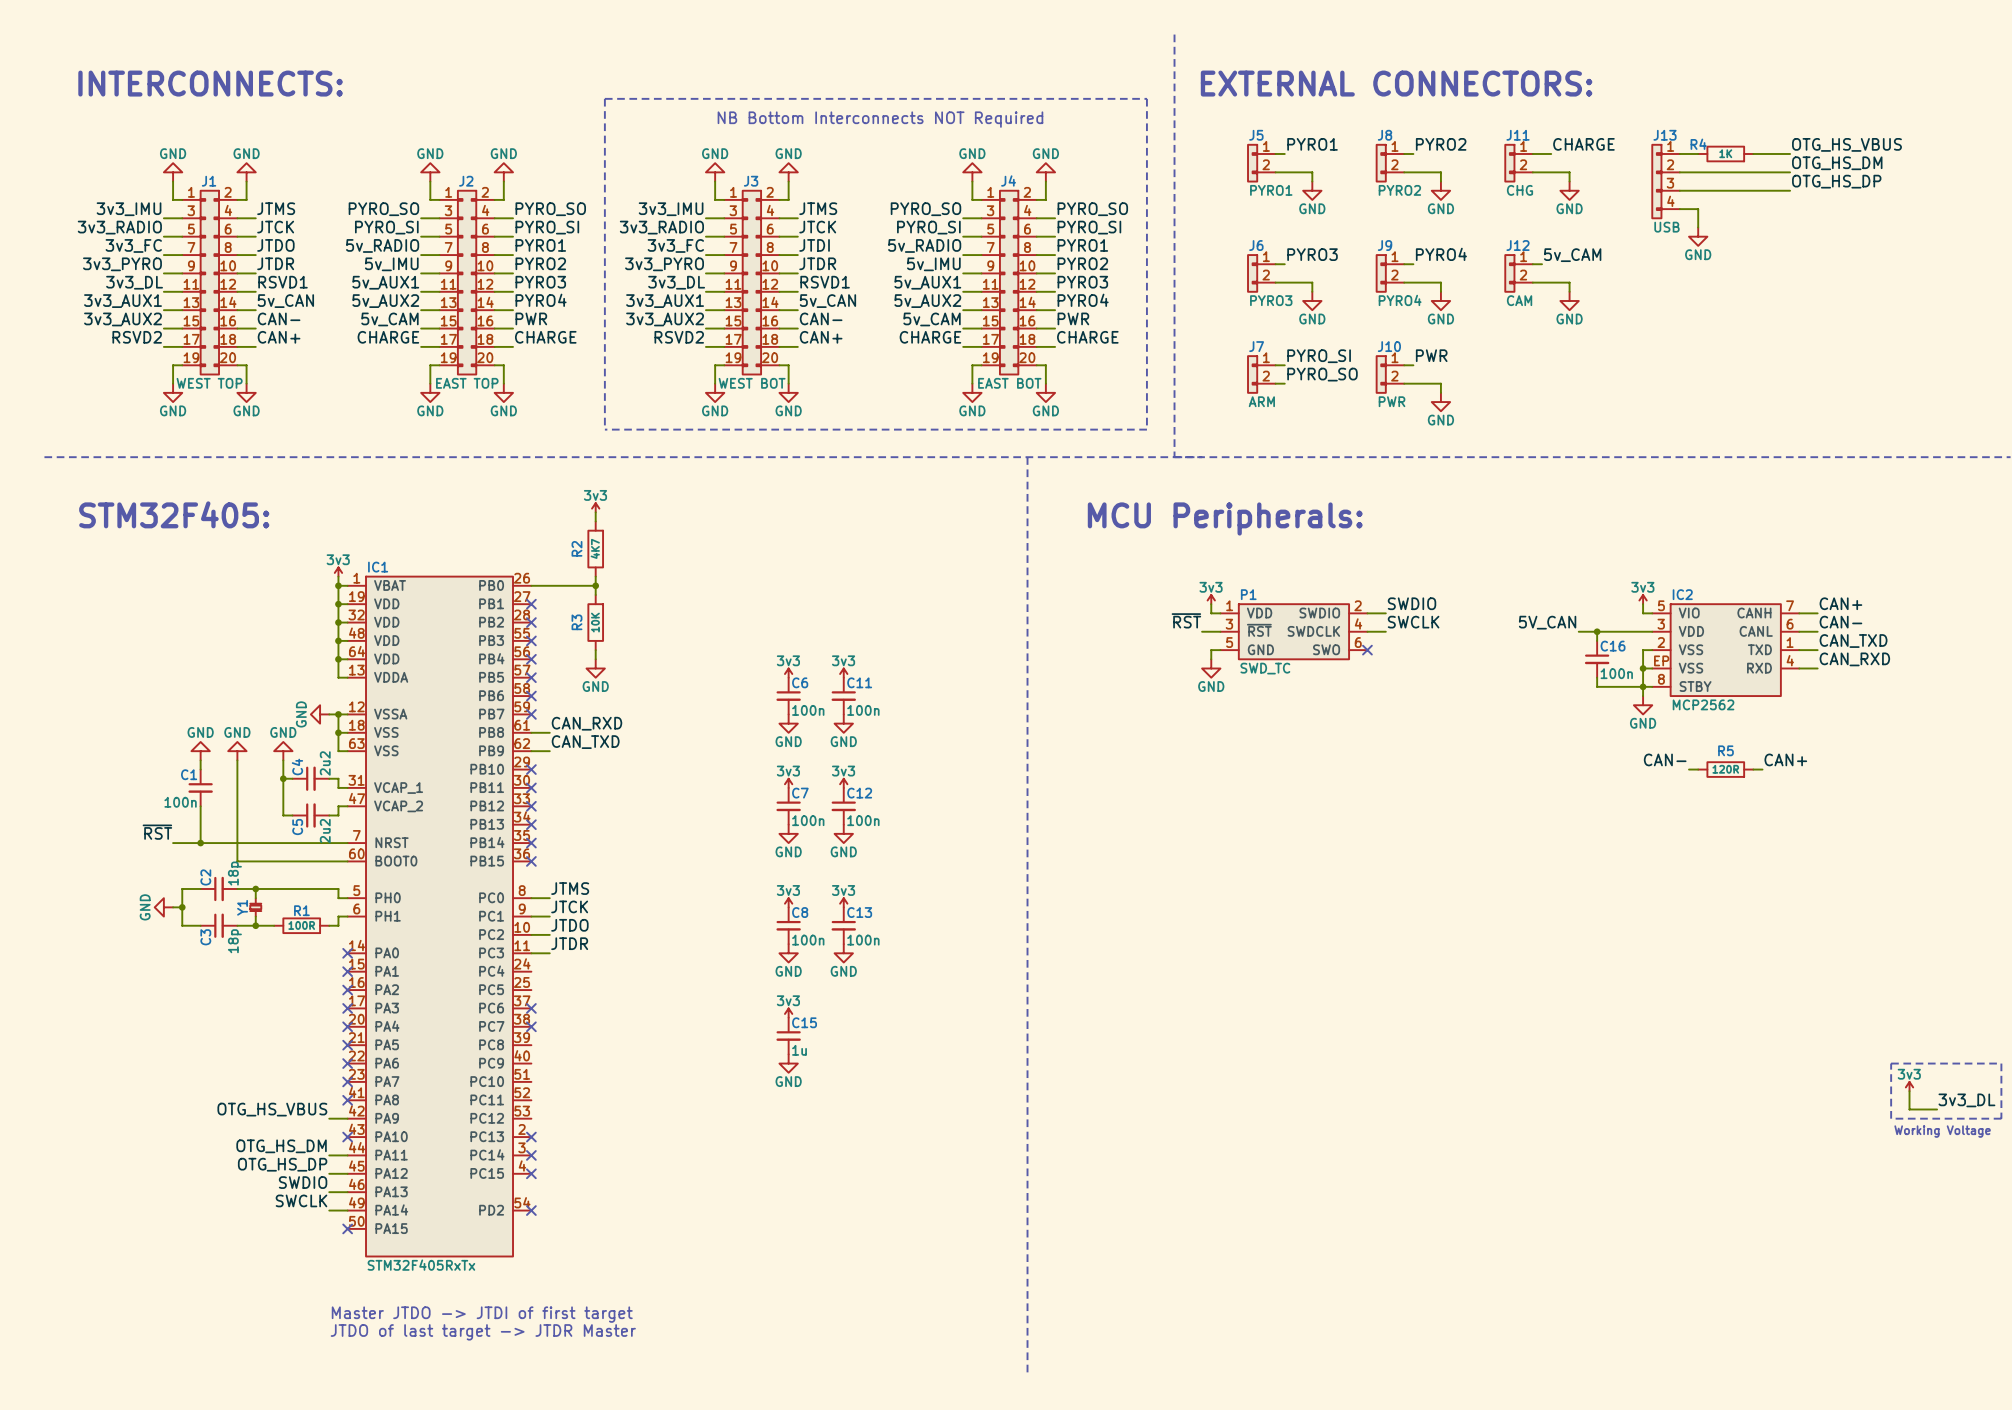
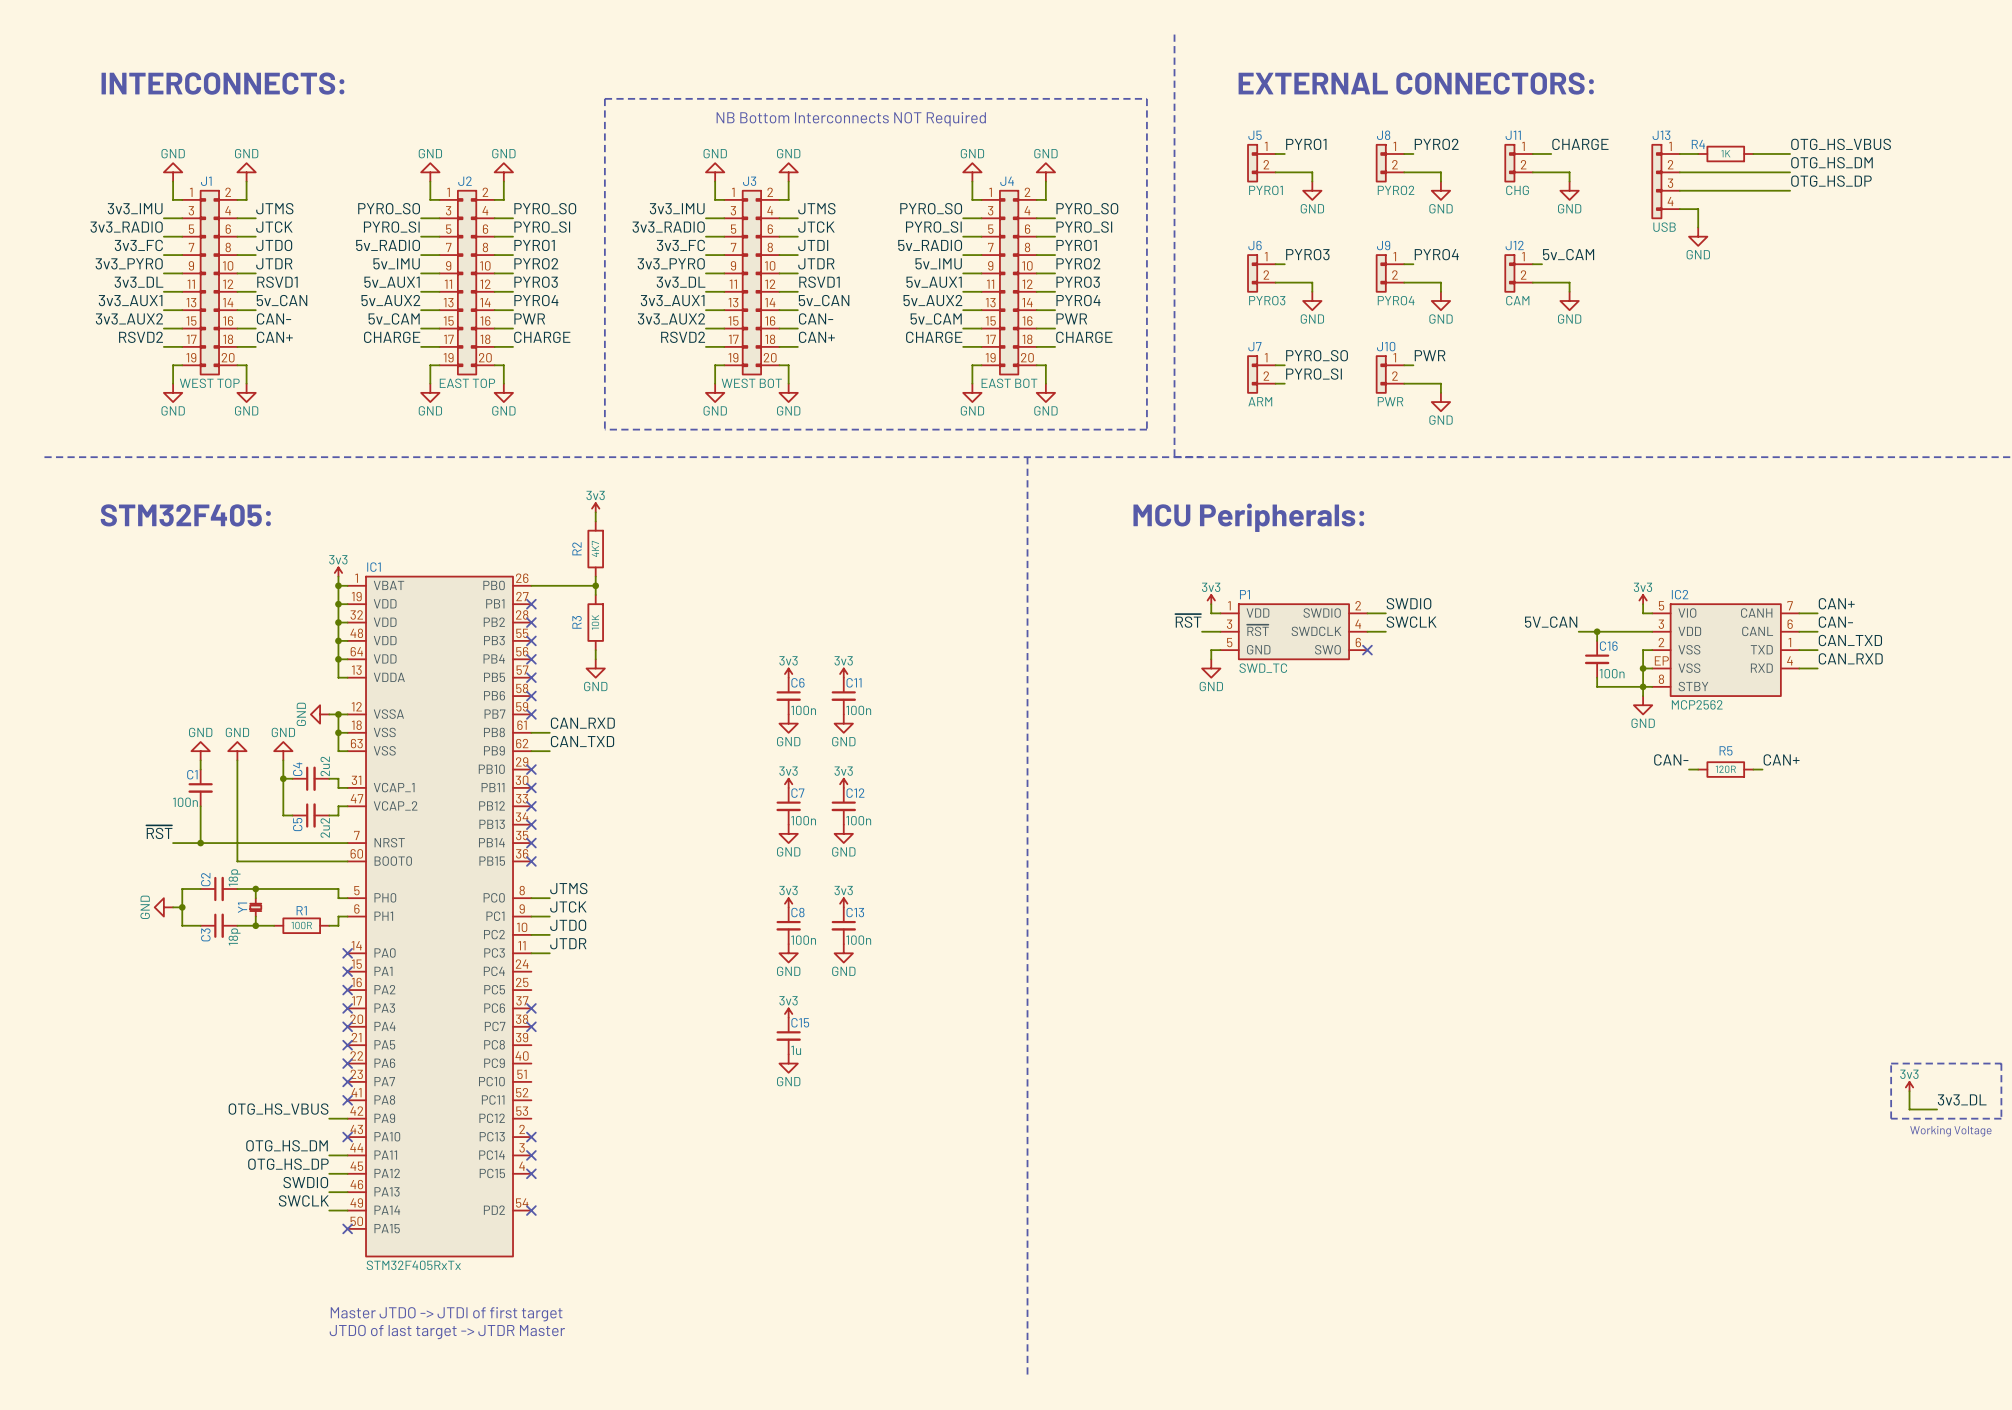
label: PYRO_SI (1319, 356) -> PYRO_SO (1317, 355)
label: PYRO_SO (1322, 374) -> PYRO_SI (1314, 374)

